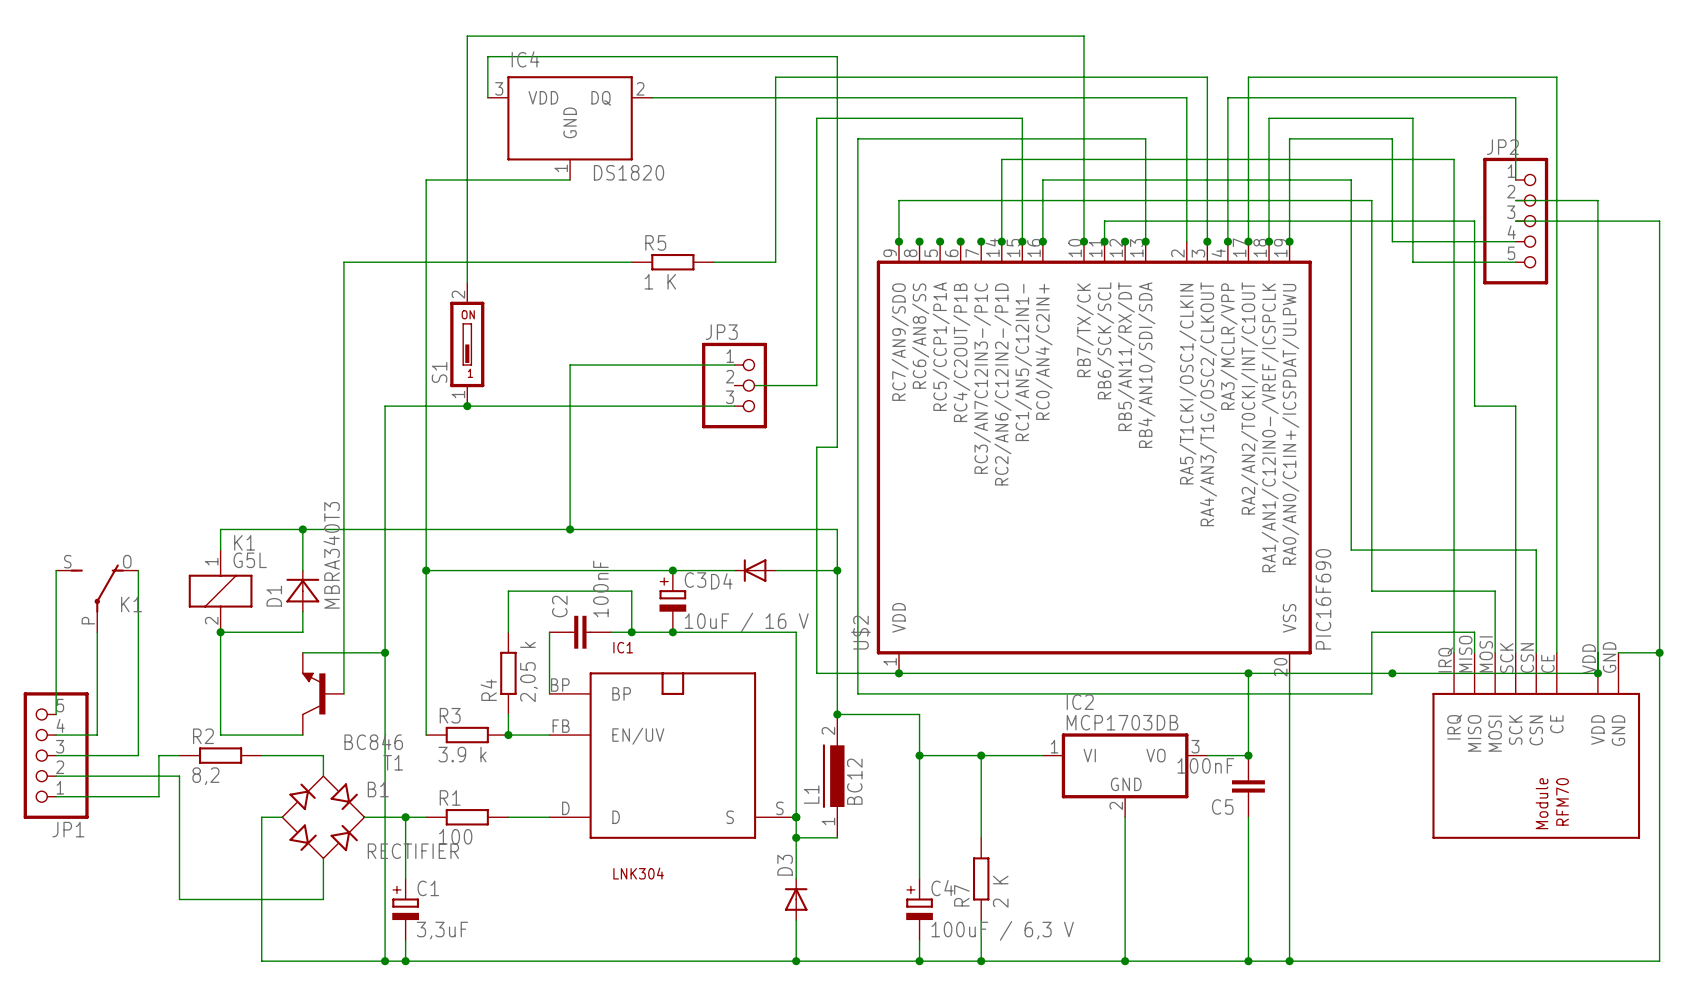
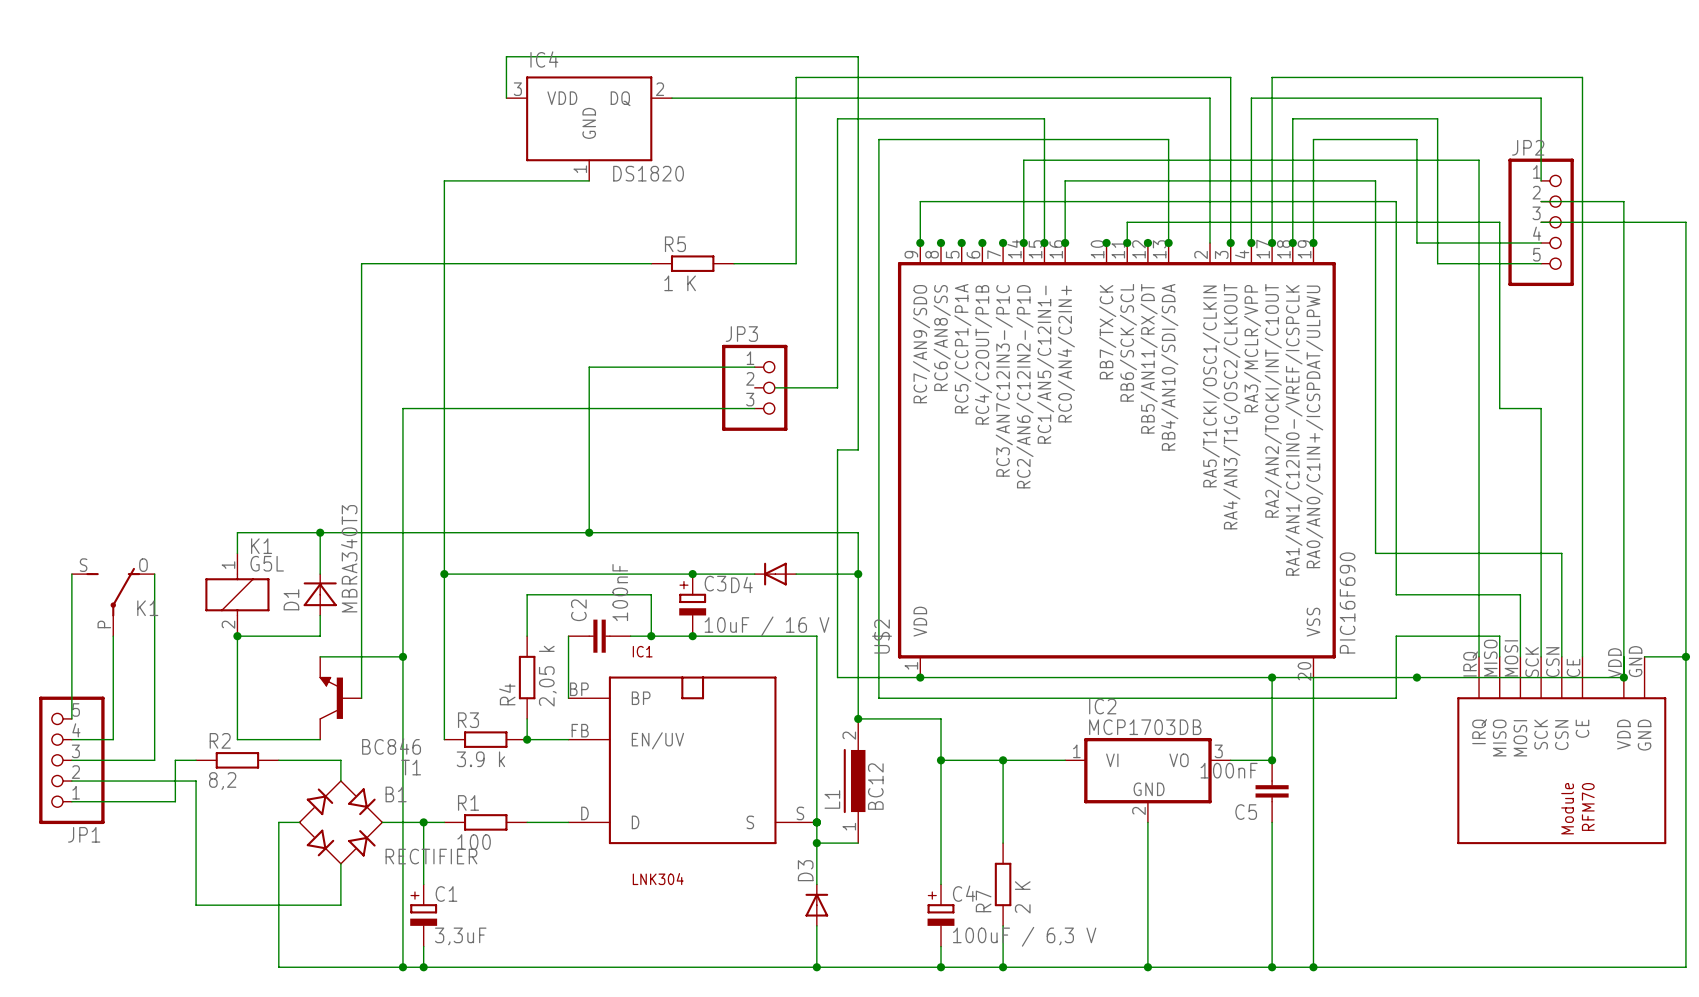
wire: (1084, 241) (1084, 36) (467, 36) (467, 282) -> none
S1: (467, 344) -> none
junction: (467, 406) -> none

